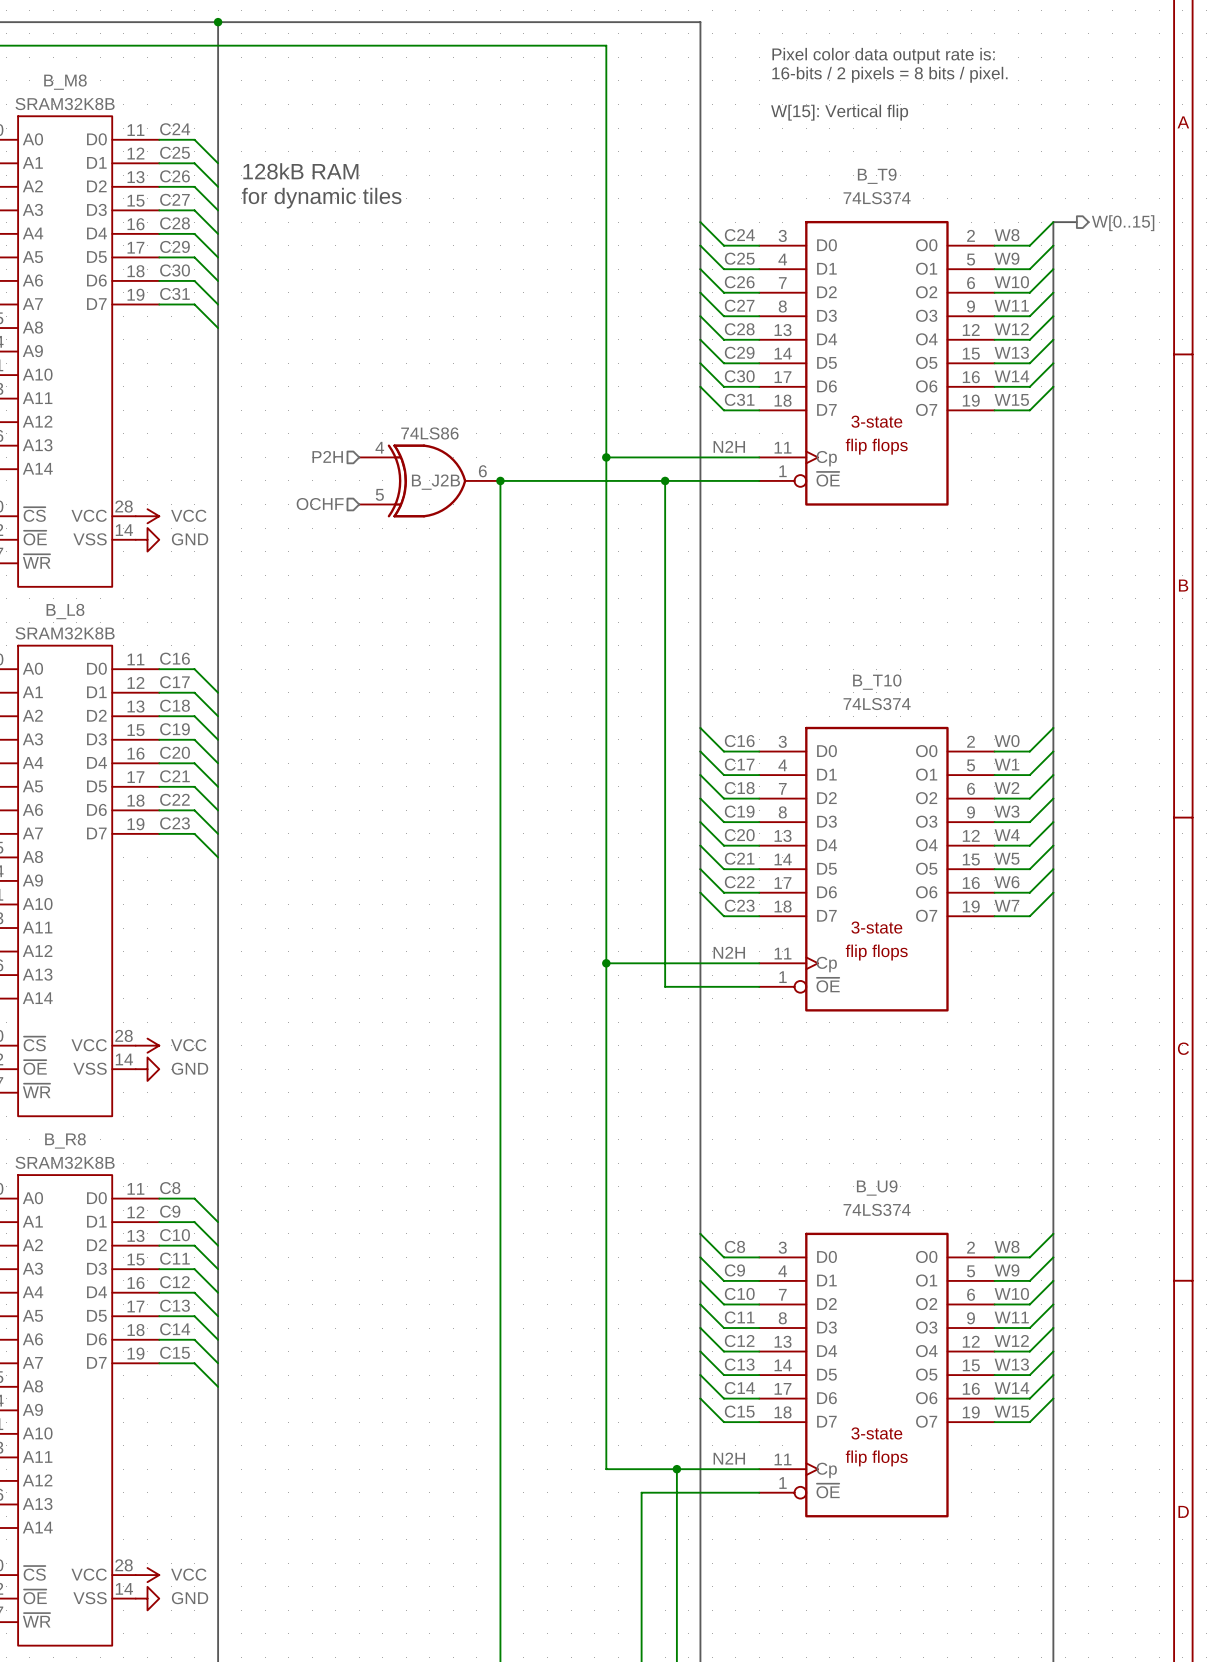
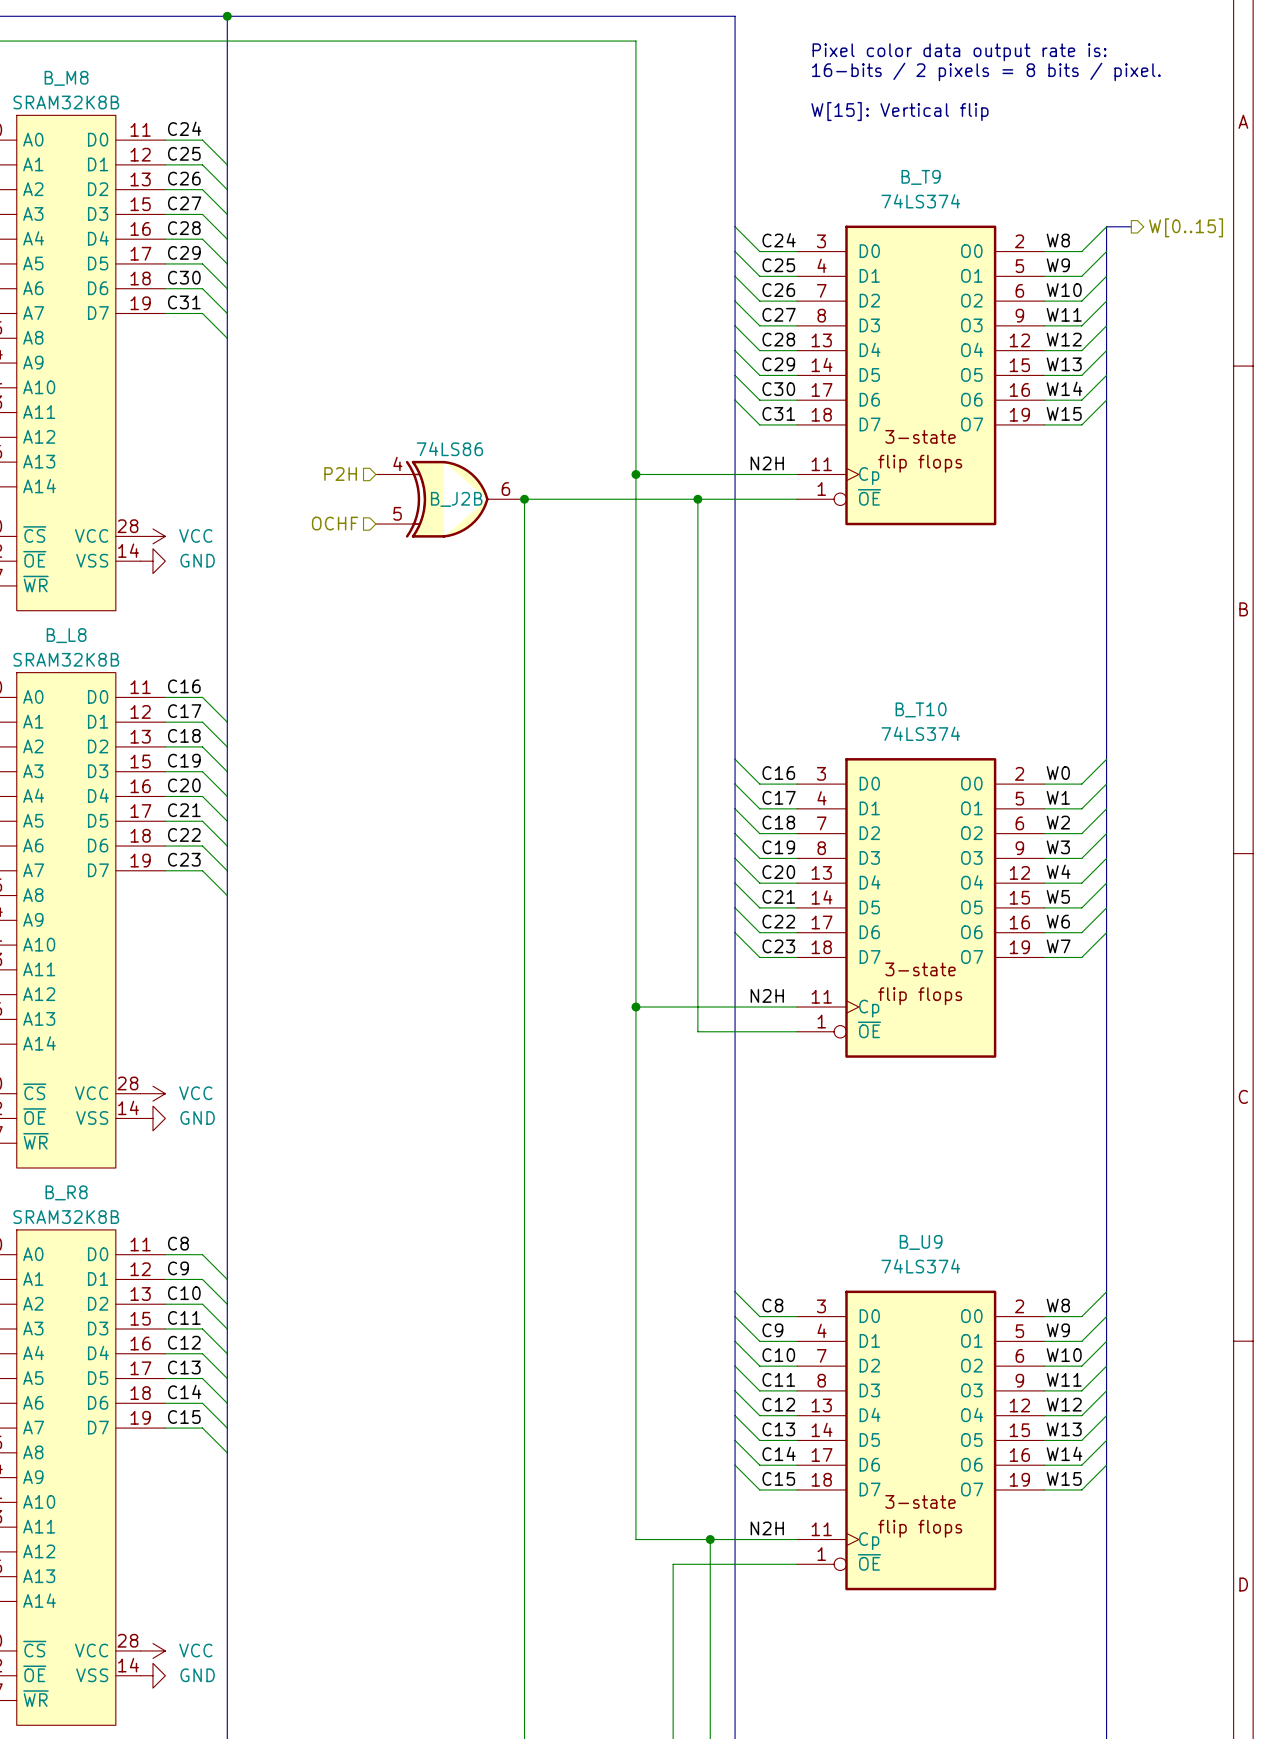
text: 128kB RAM (300, 171) -> none
text: for dynamic tiles (321, 198) -> none

